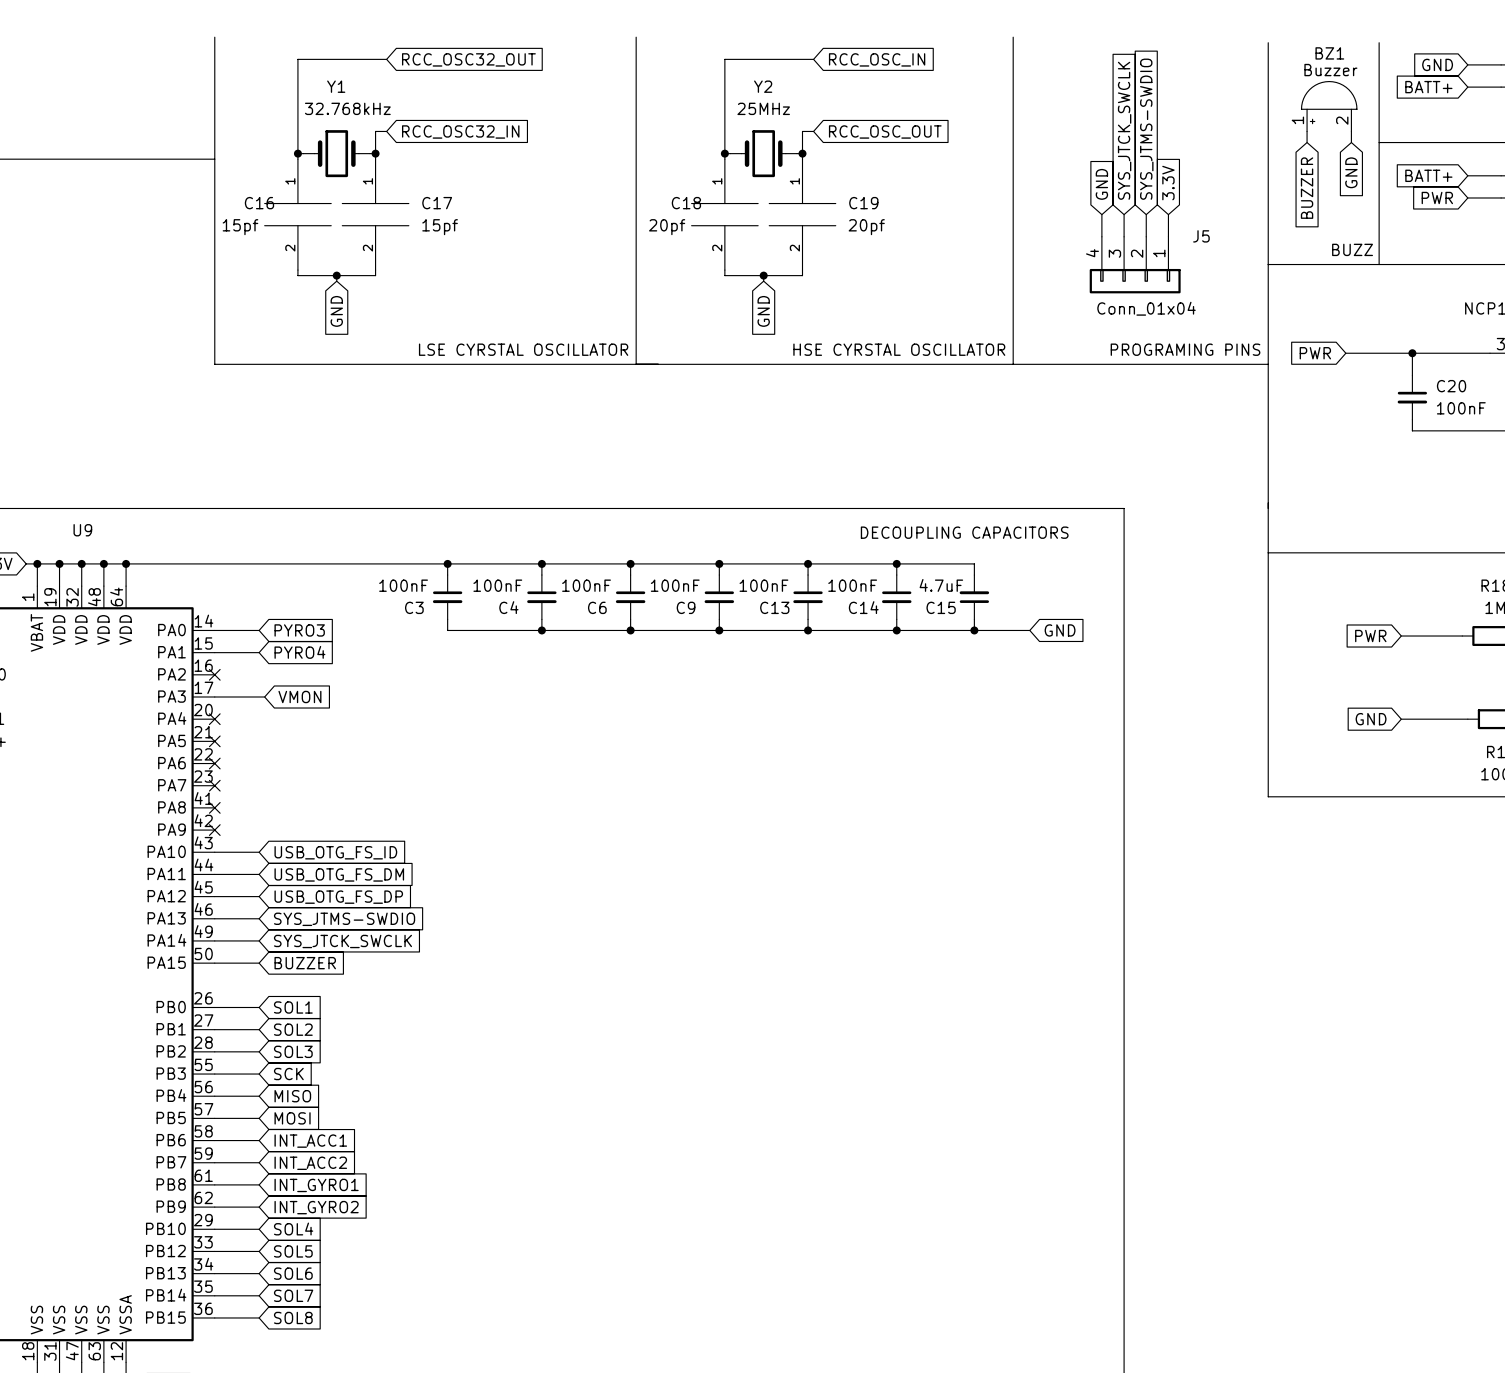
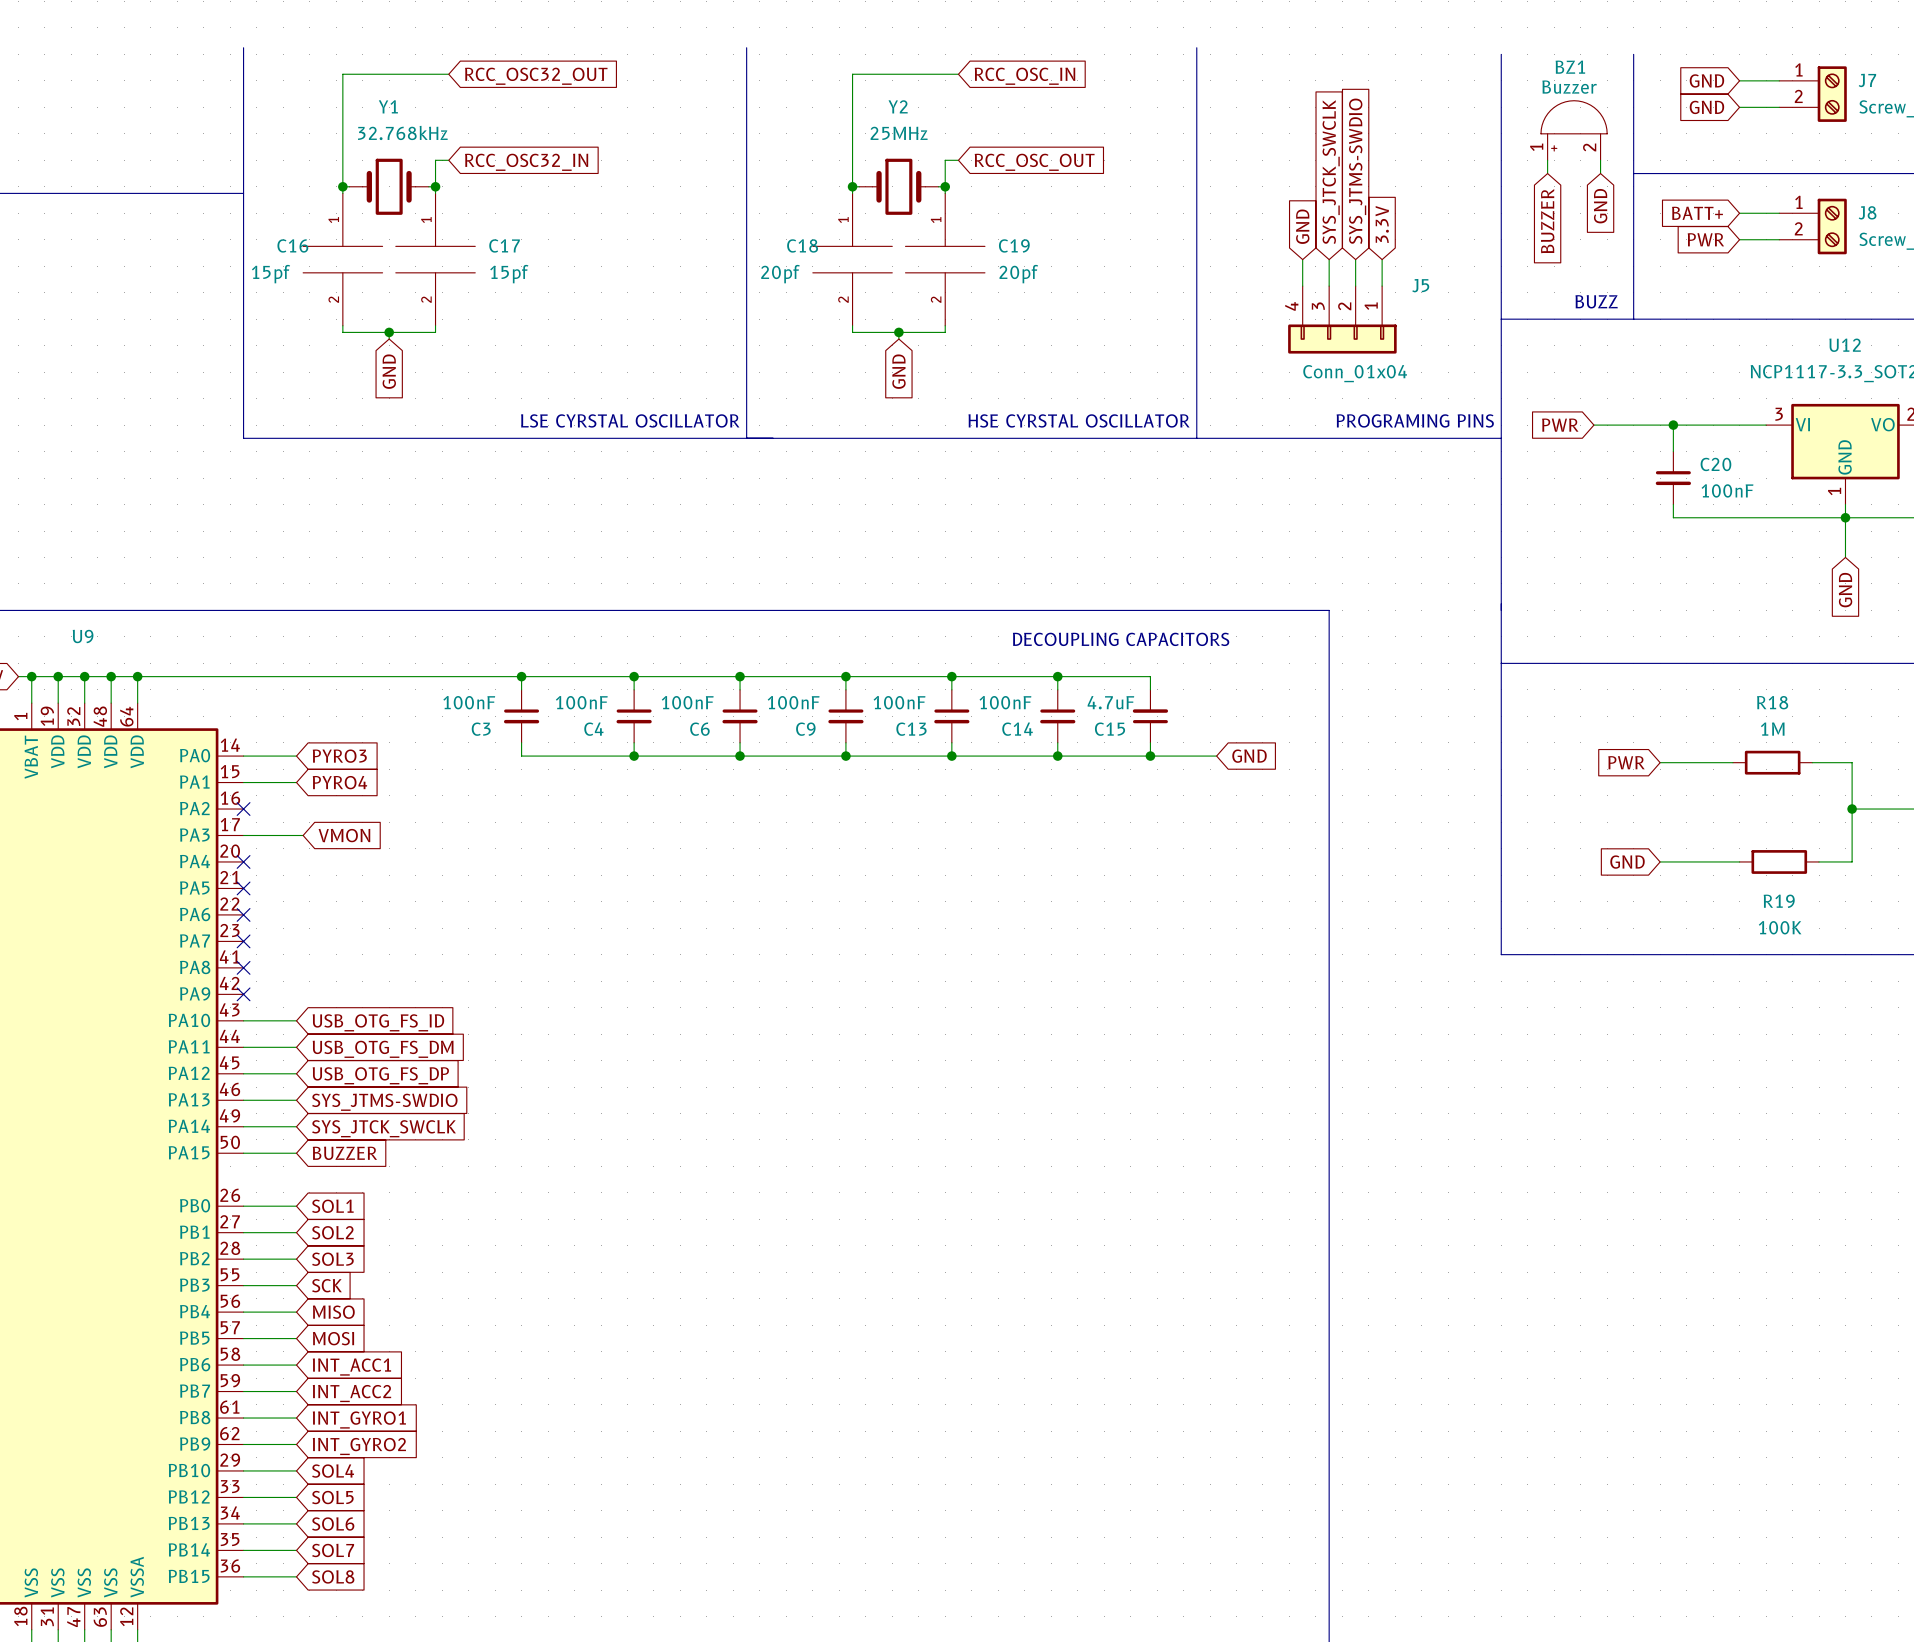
global label: BATT+ (1428, 87) -> GND (1706, 107)

